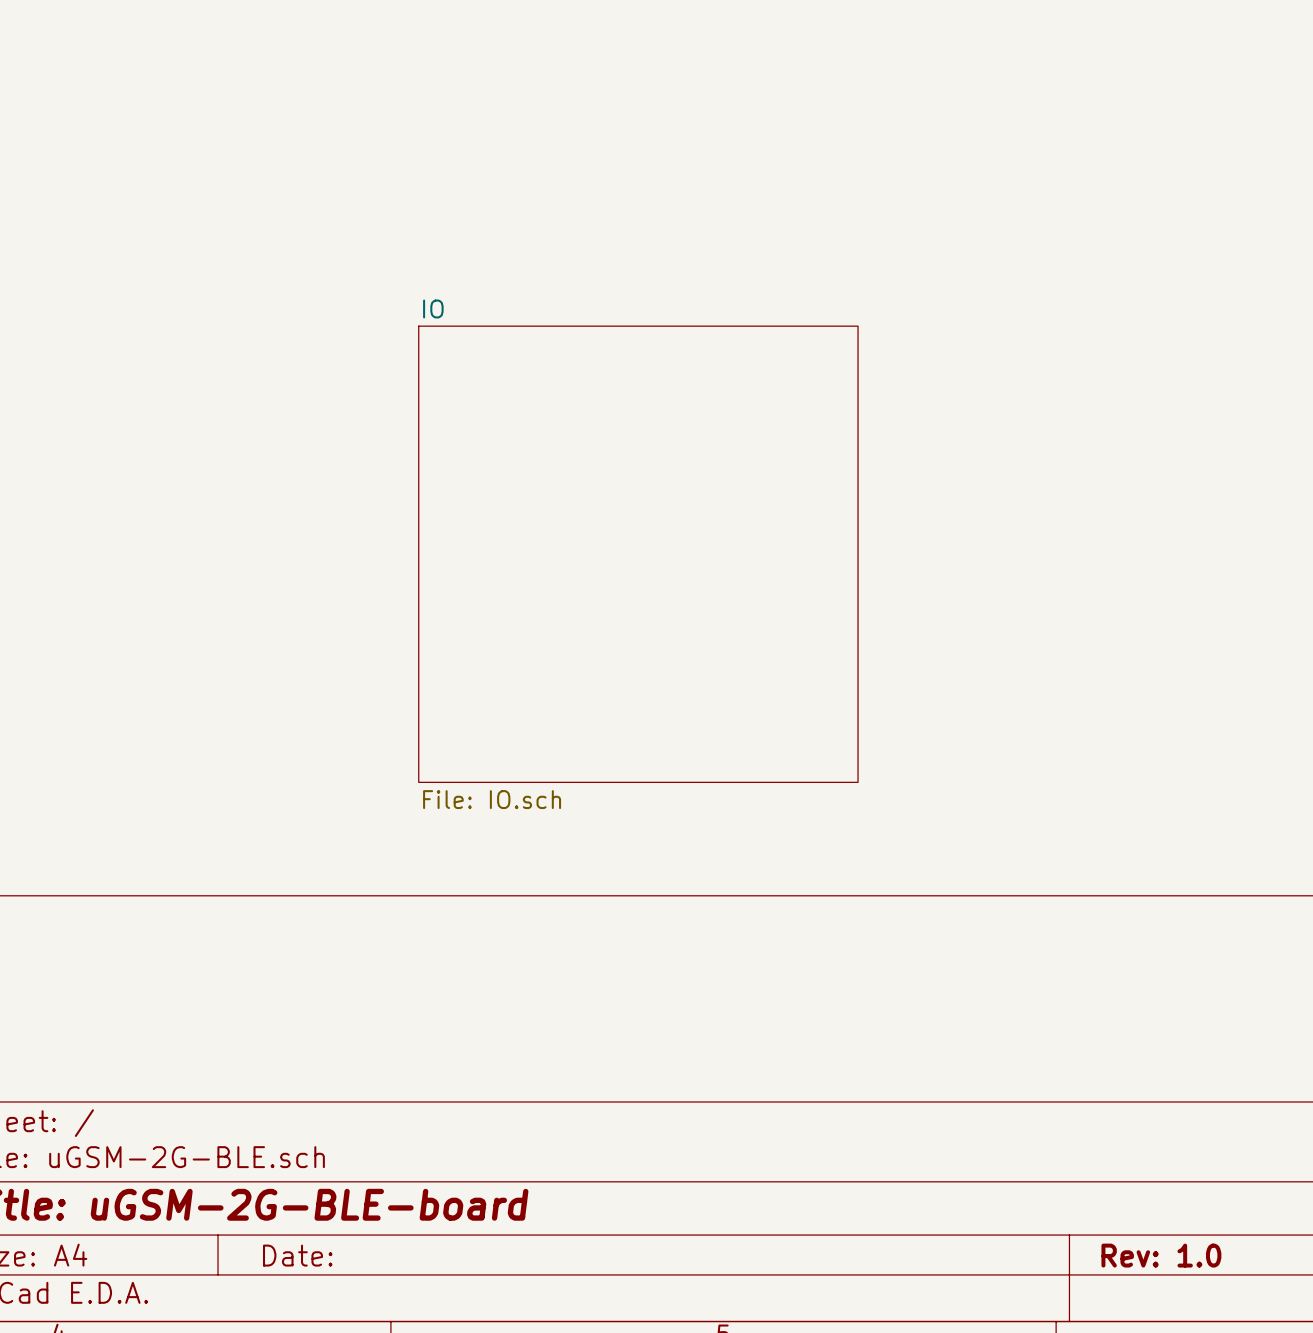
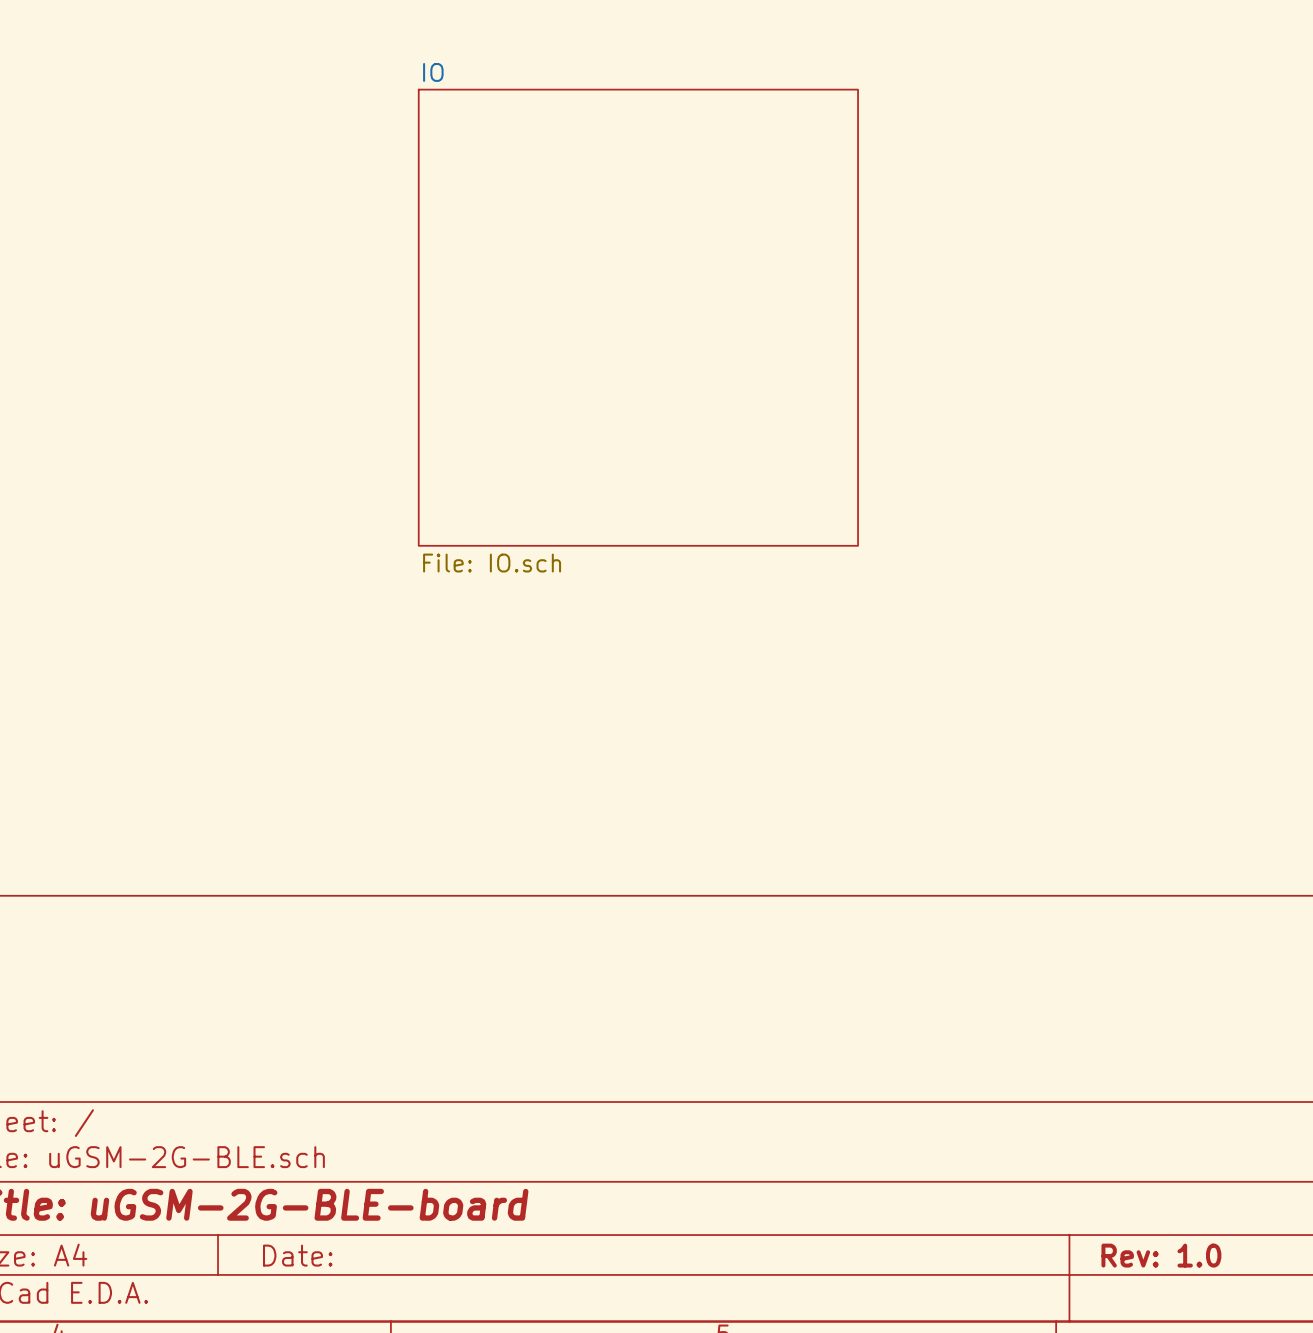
sheet IO position: (638, 554) -> (638, 317)

